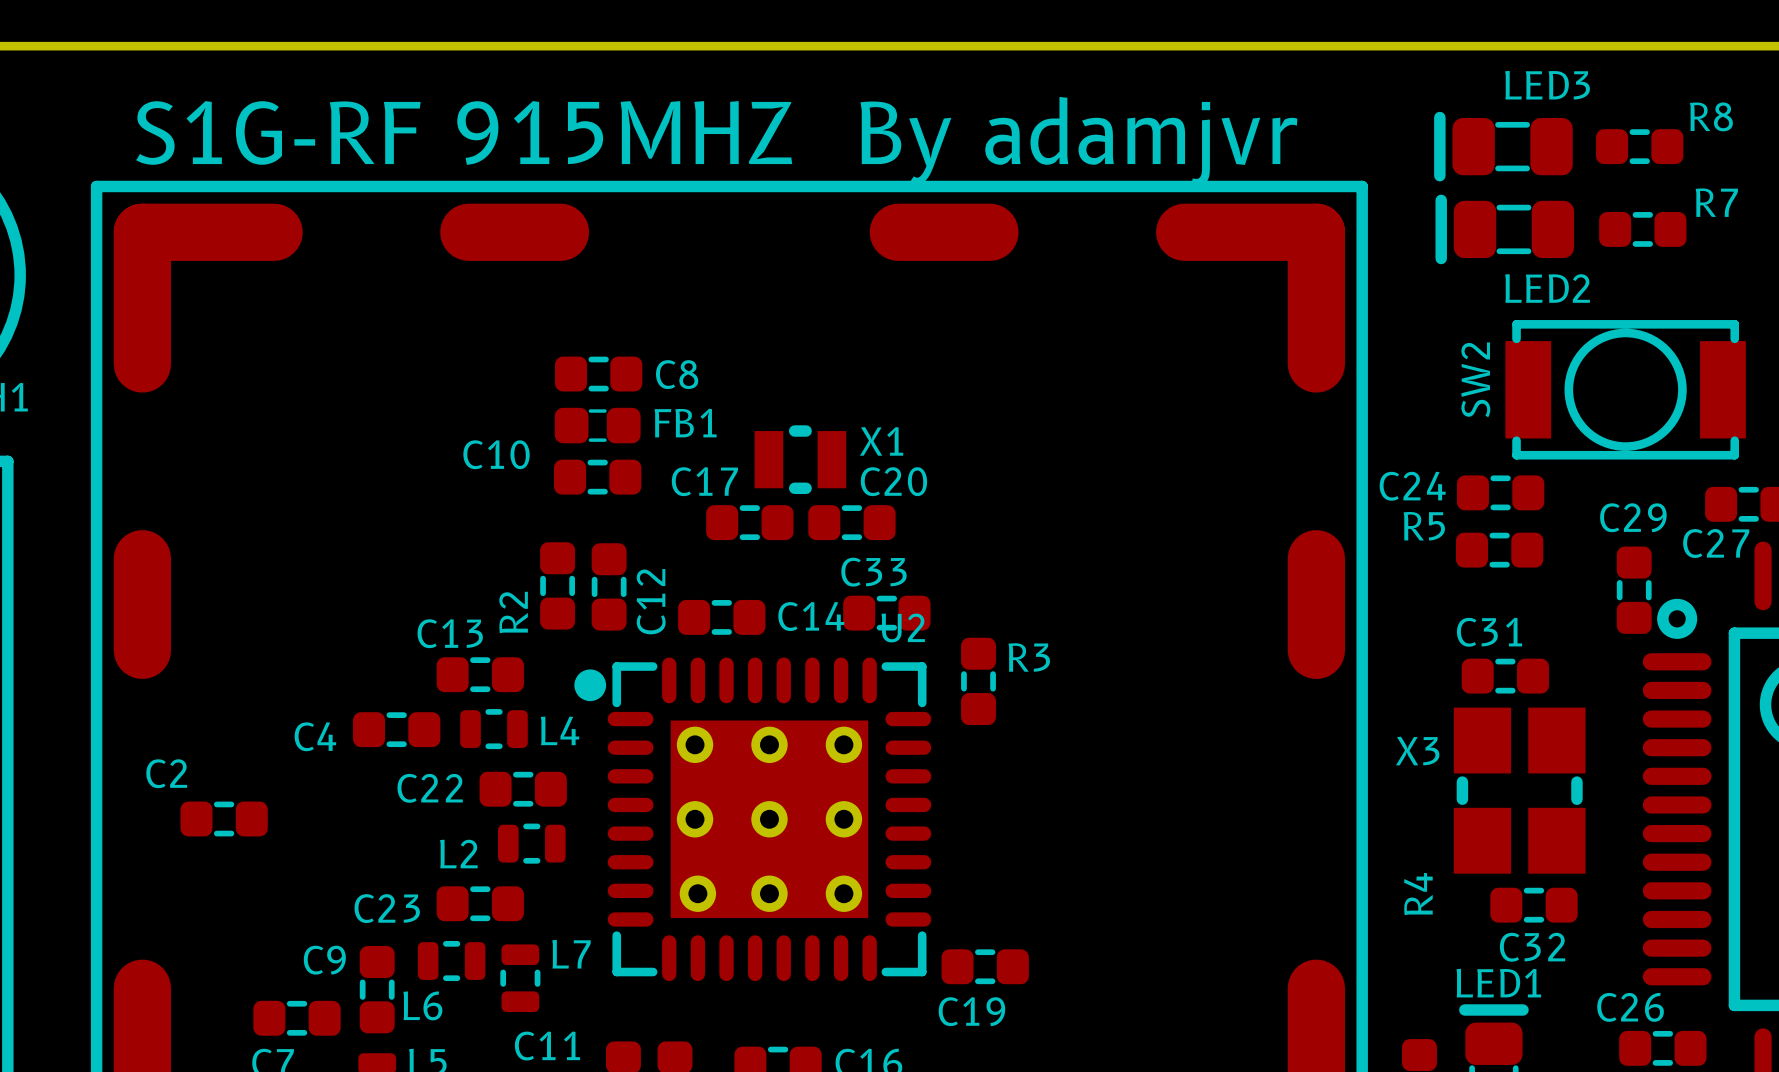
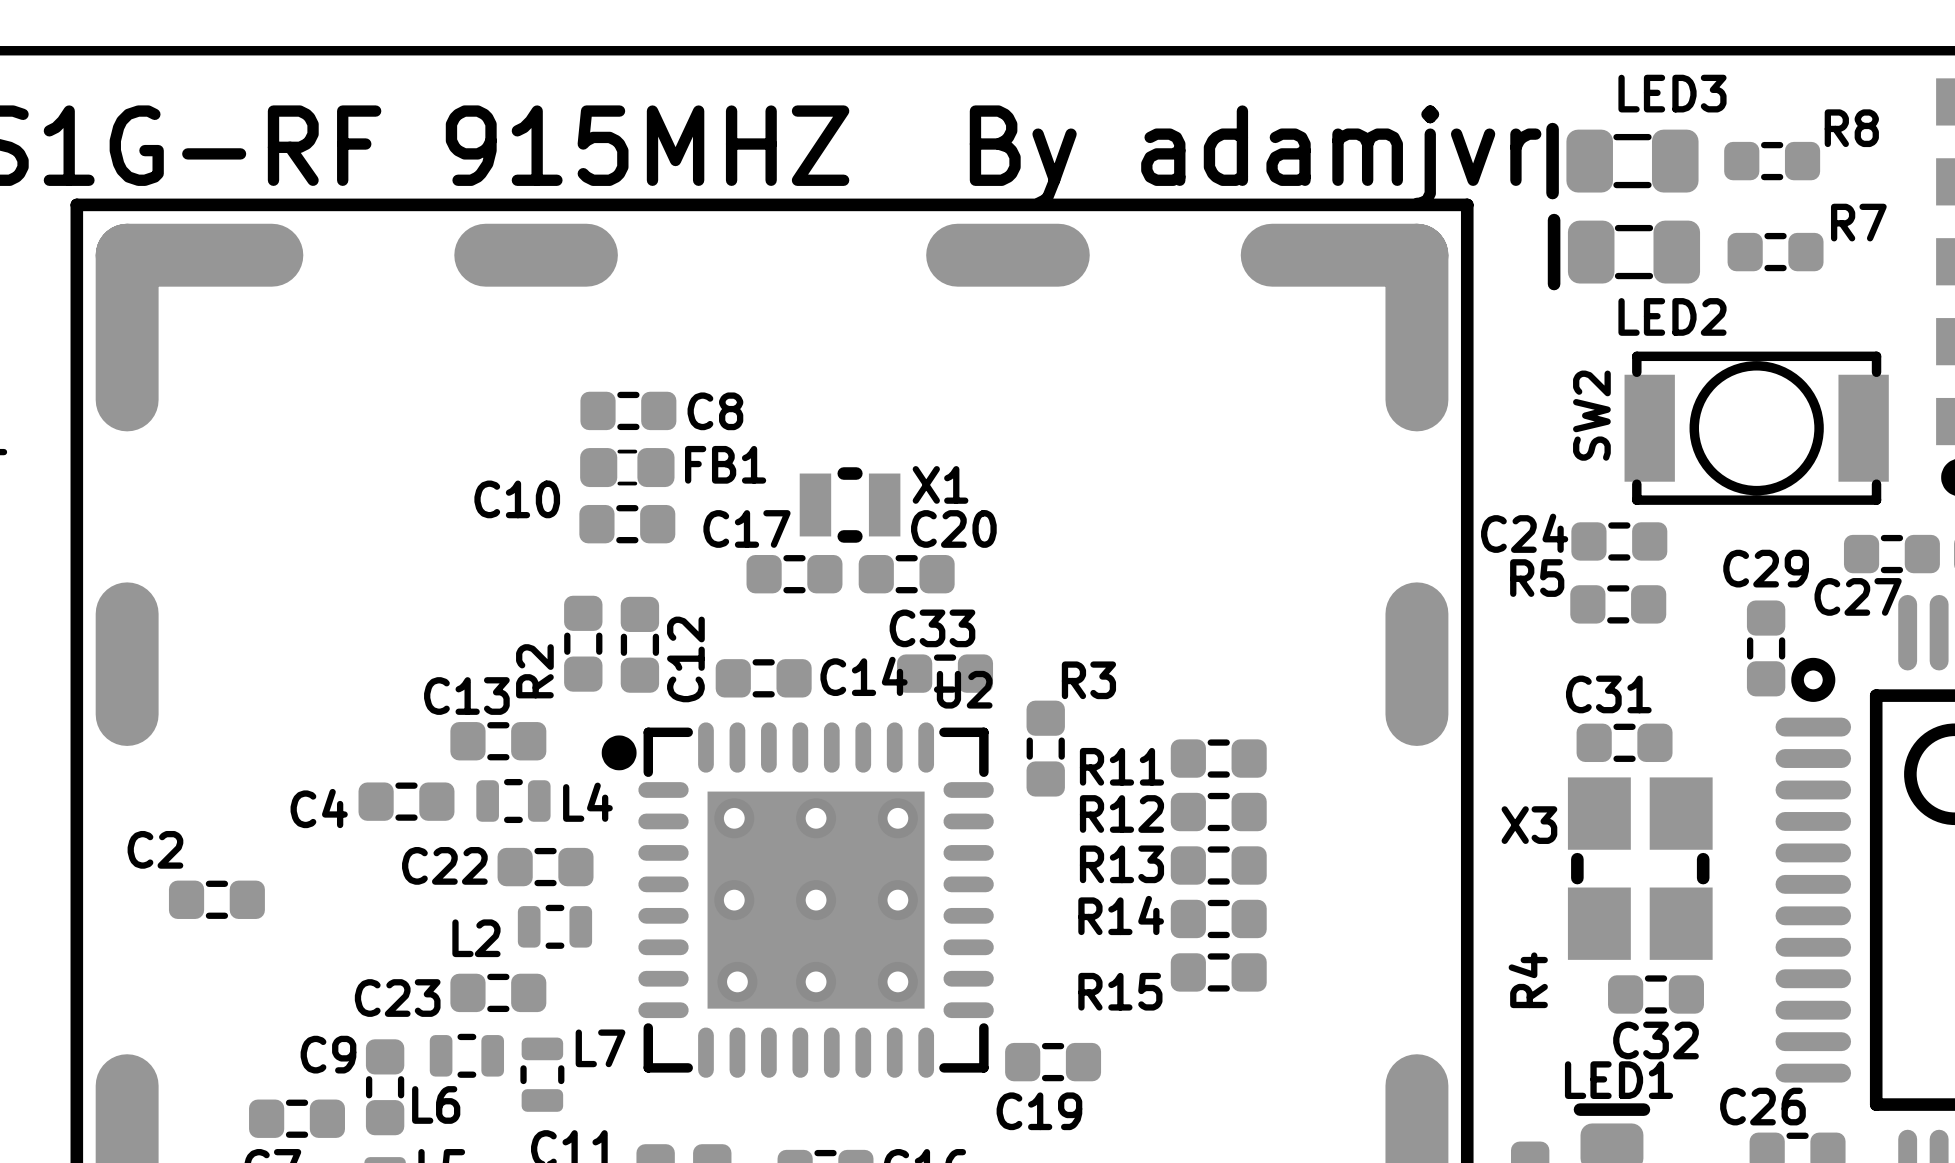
R3 name position: R3 (1029, 657) -> R3 (1088, 680)
R11: none -> (1218, 758)
R12: none -> (1218, 812)
R13: none -> (1218, 865)
R14: none -> (1218, 918)
R15: none -> (1218, 972)

